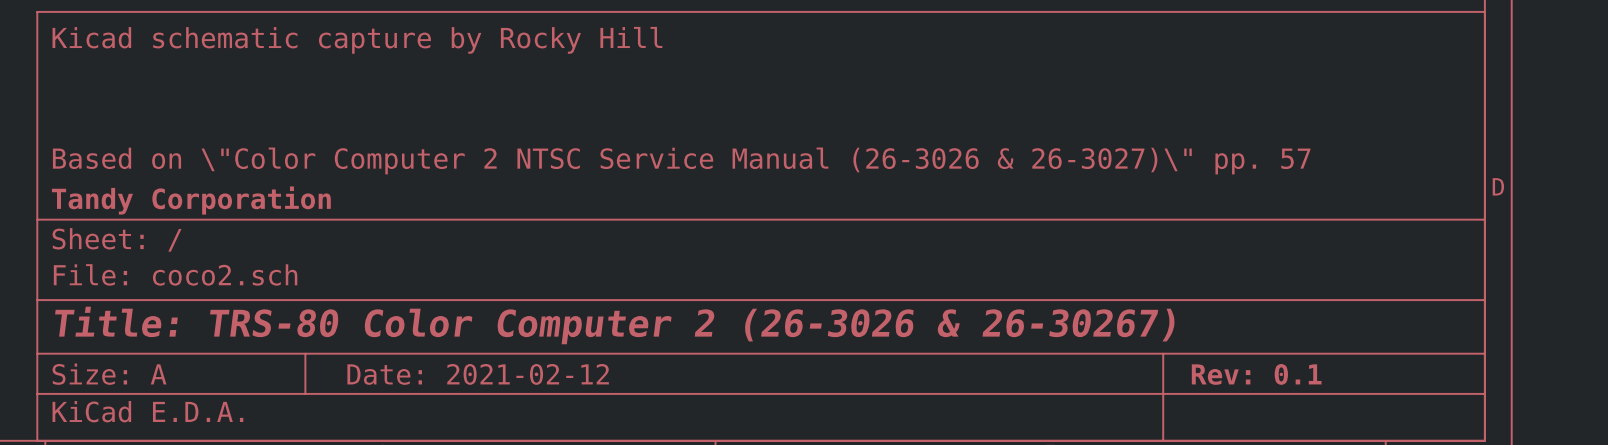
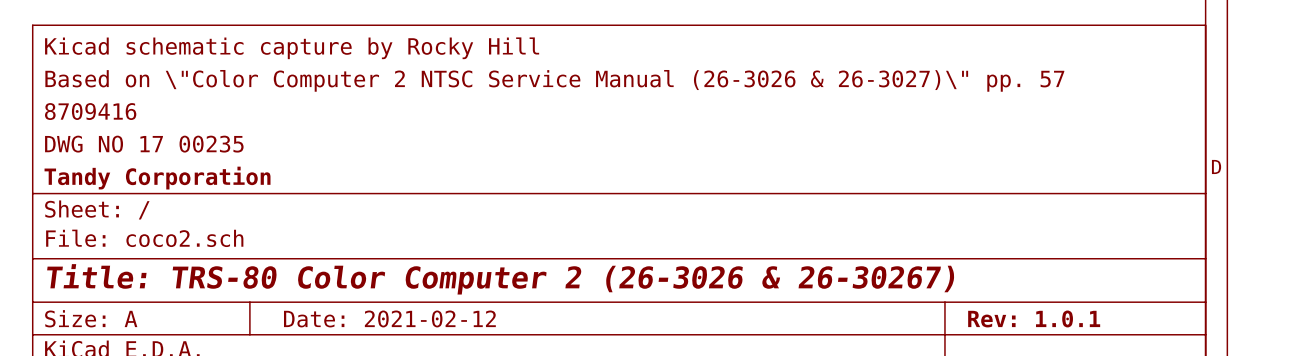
title block: none -> Based on \"Color Computer 2 NTSC Service Manual (26-3026 & 26-3027)\" pp. 57 (554, 80)
title block: none -> 8709416 (90, 111)
title block: Based on \"Color Computer 2 NTSC Service Manual (26-3026 & 26-3027)\" pp. 57 (681, 160) -> DWG NO 17 00235 (144, 144)
title block: Rev: 0.1 (1256, 374) -> Rev: 1.0.1 (1034, 318)

